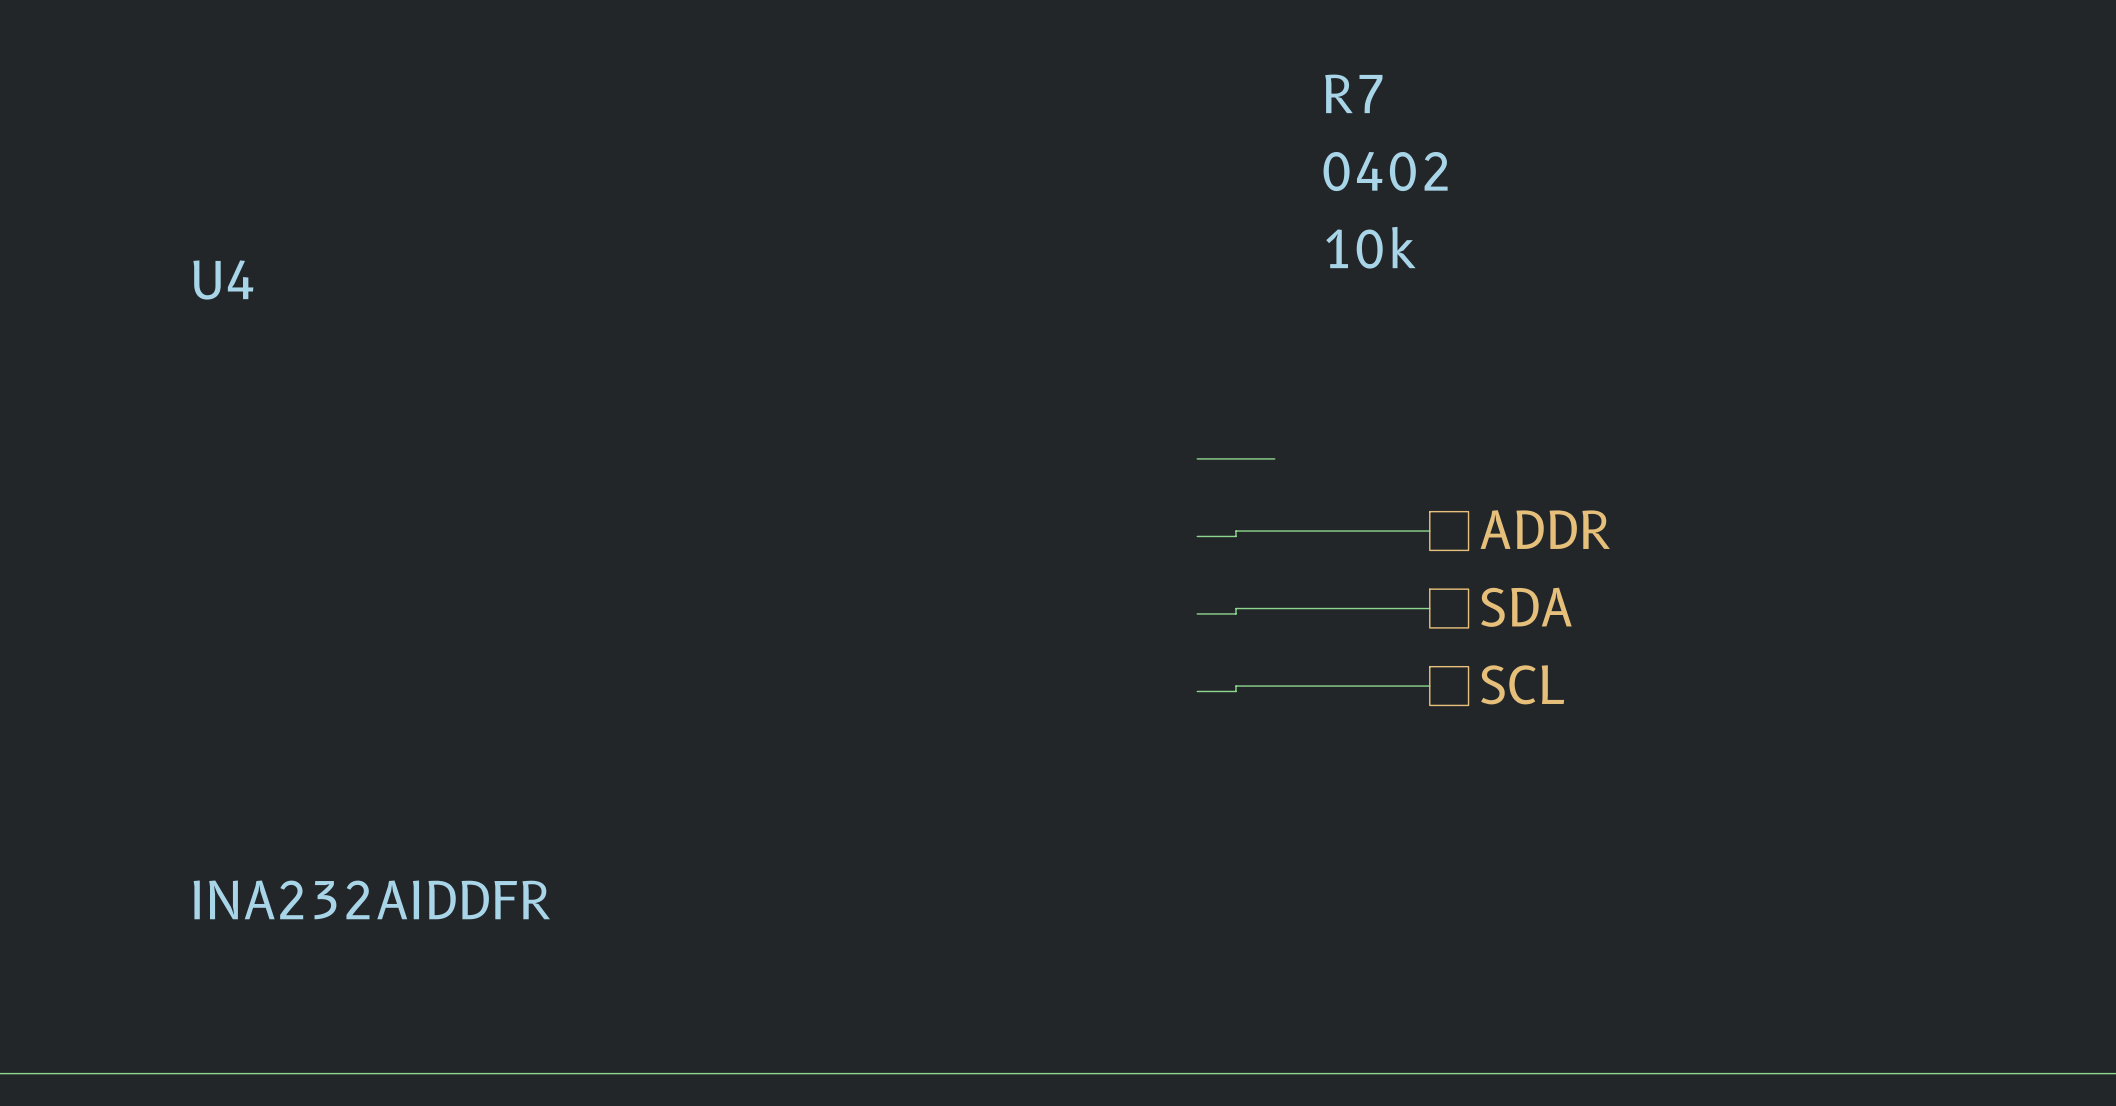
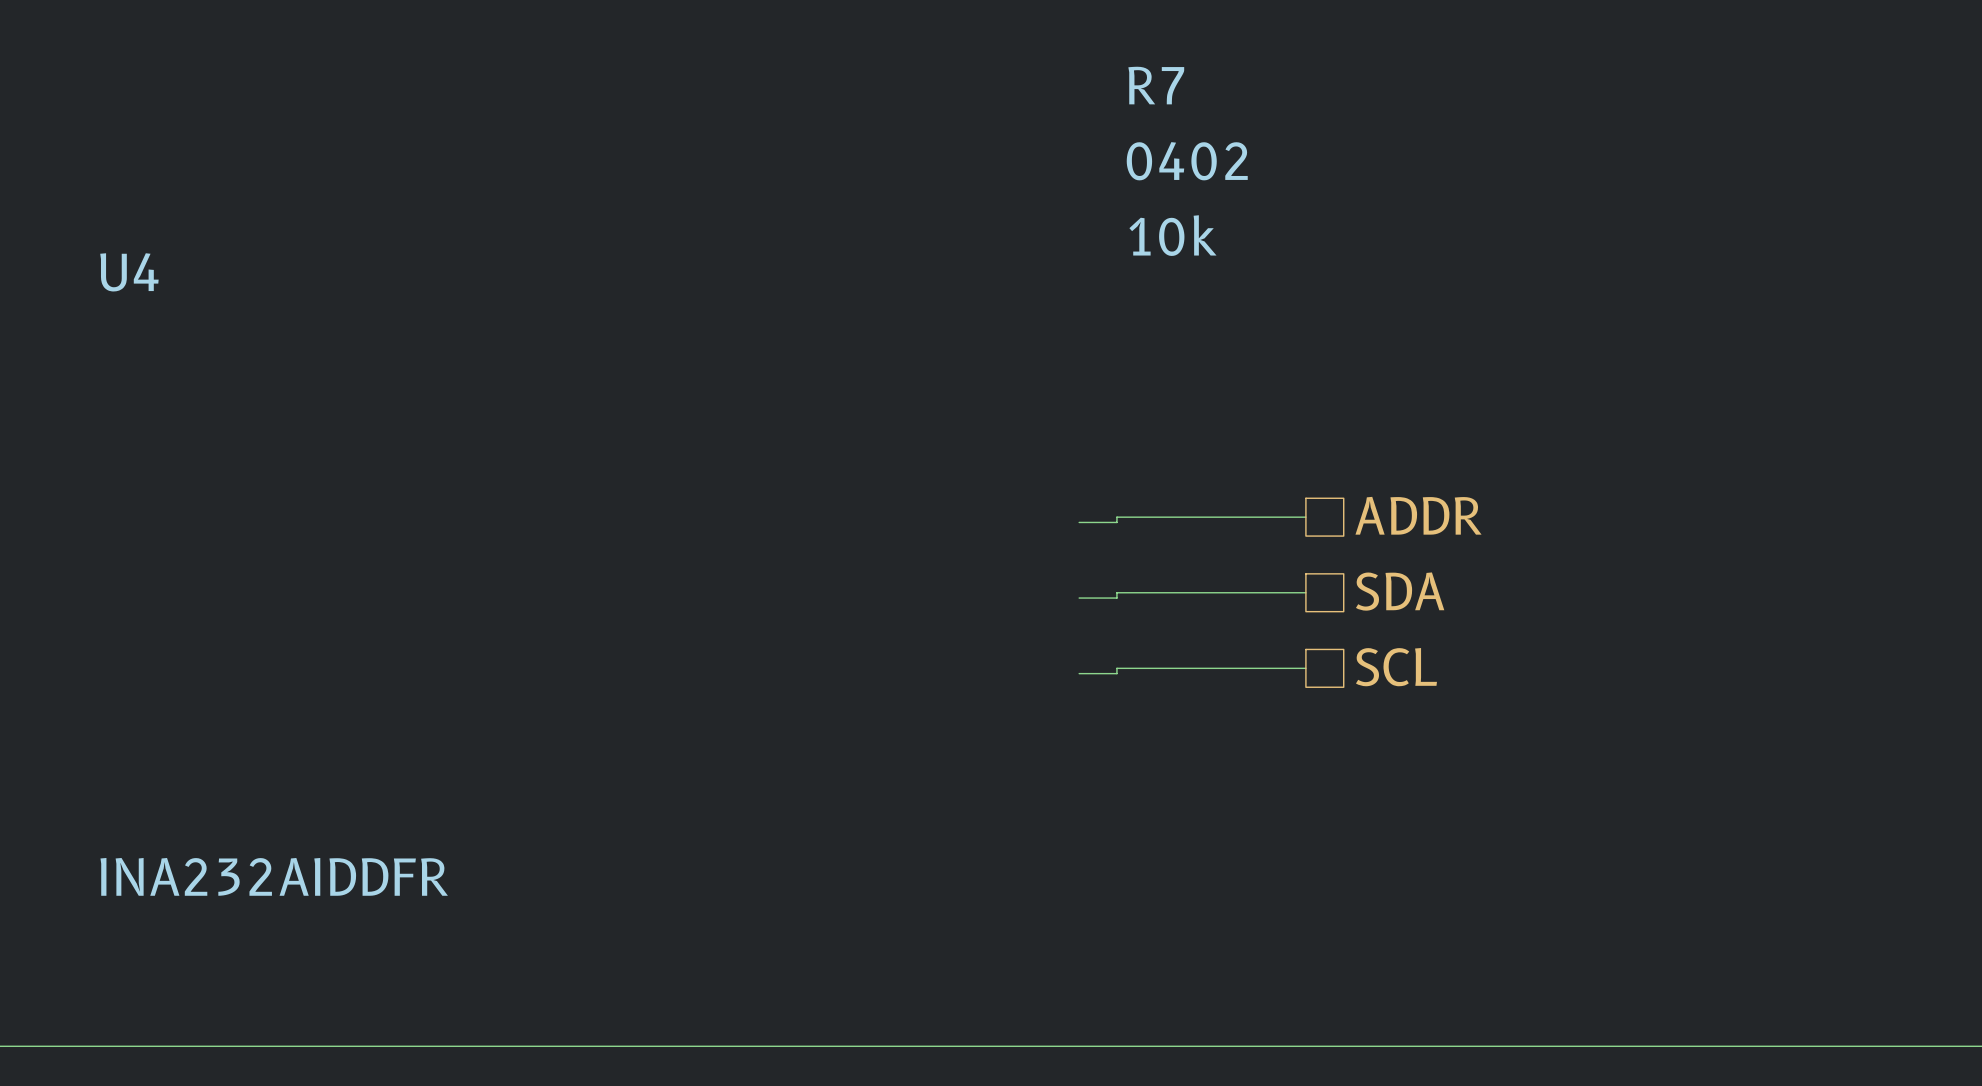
R7 position: (1385, 171) -> (1187, 161)
wire: (1197, 458) (1274, 458) -> none

